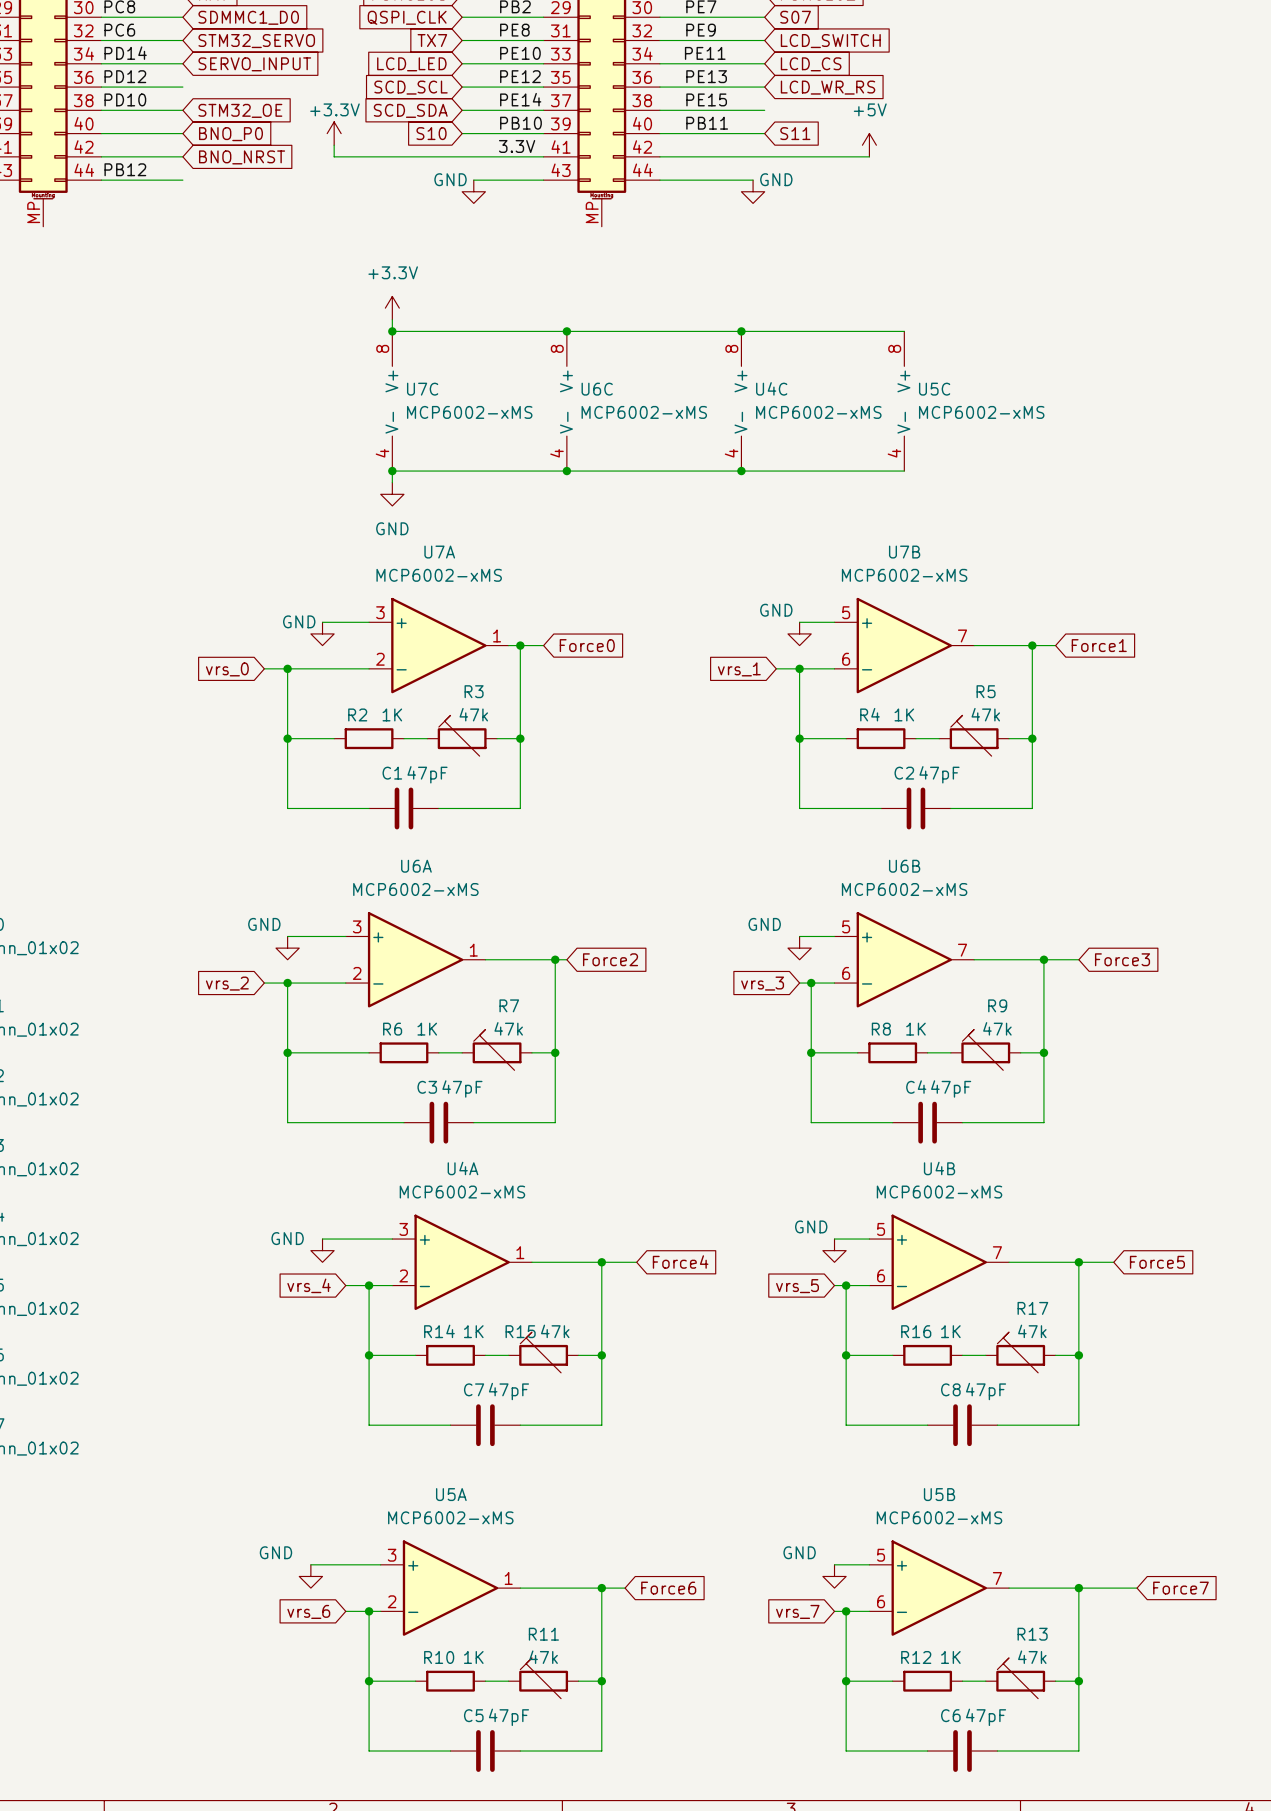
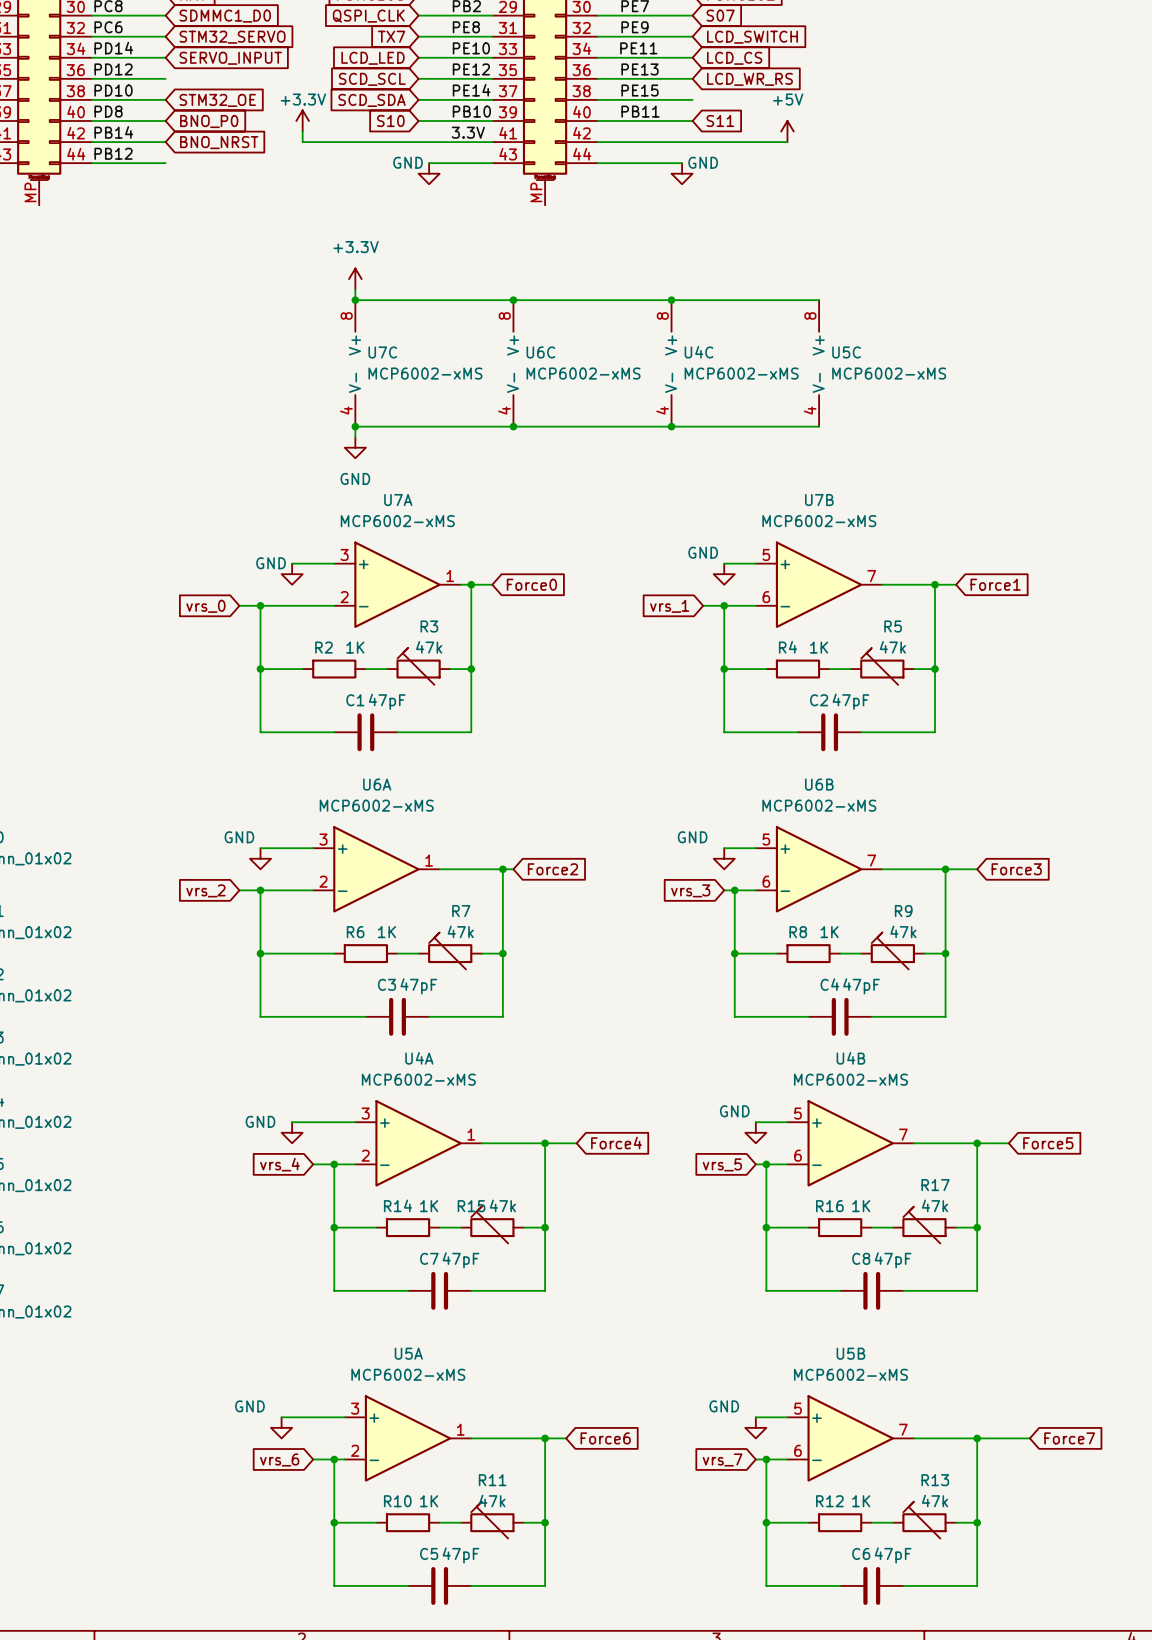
label: none -> PD8 (108, 111)
label: none -> PB14 (113, 132)

